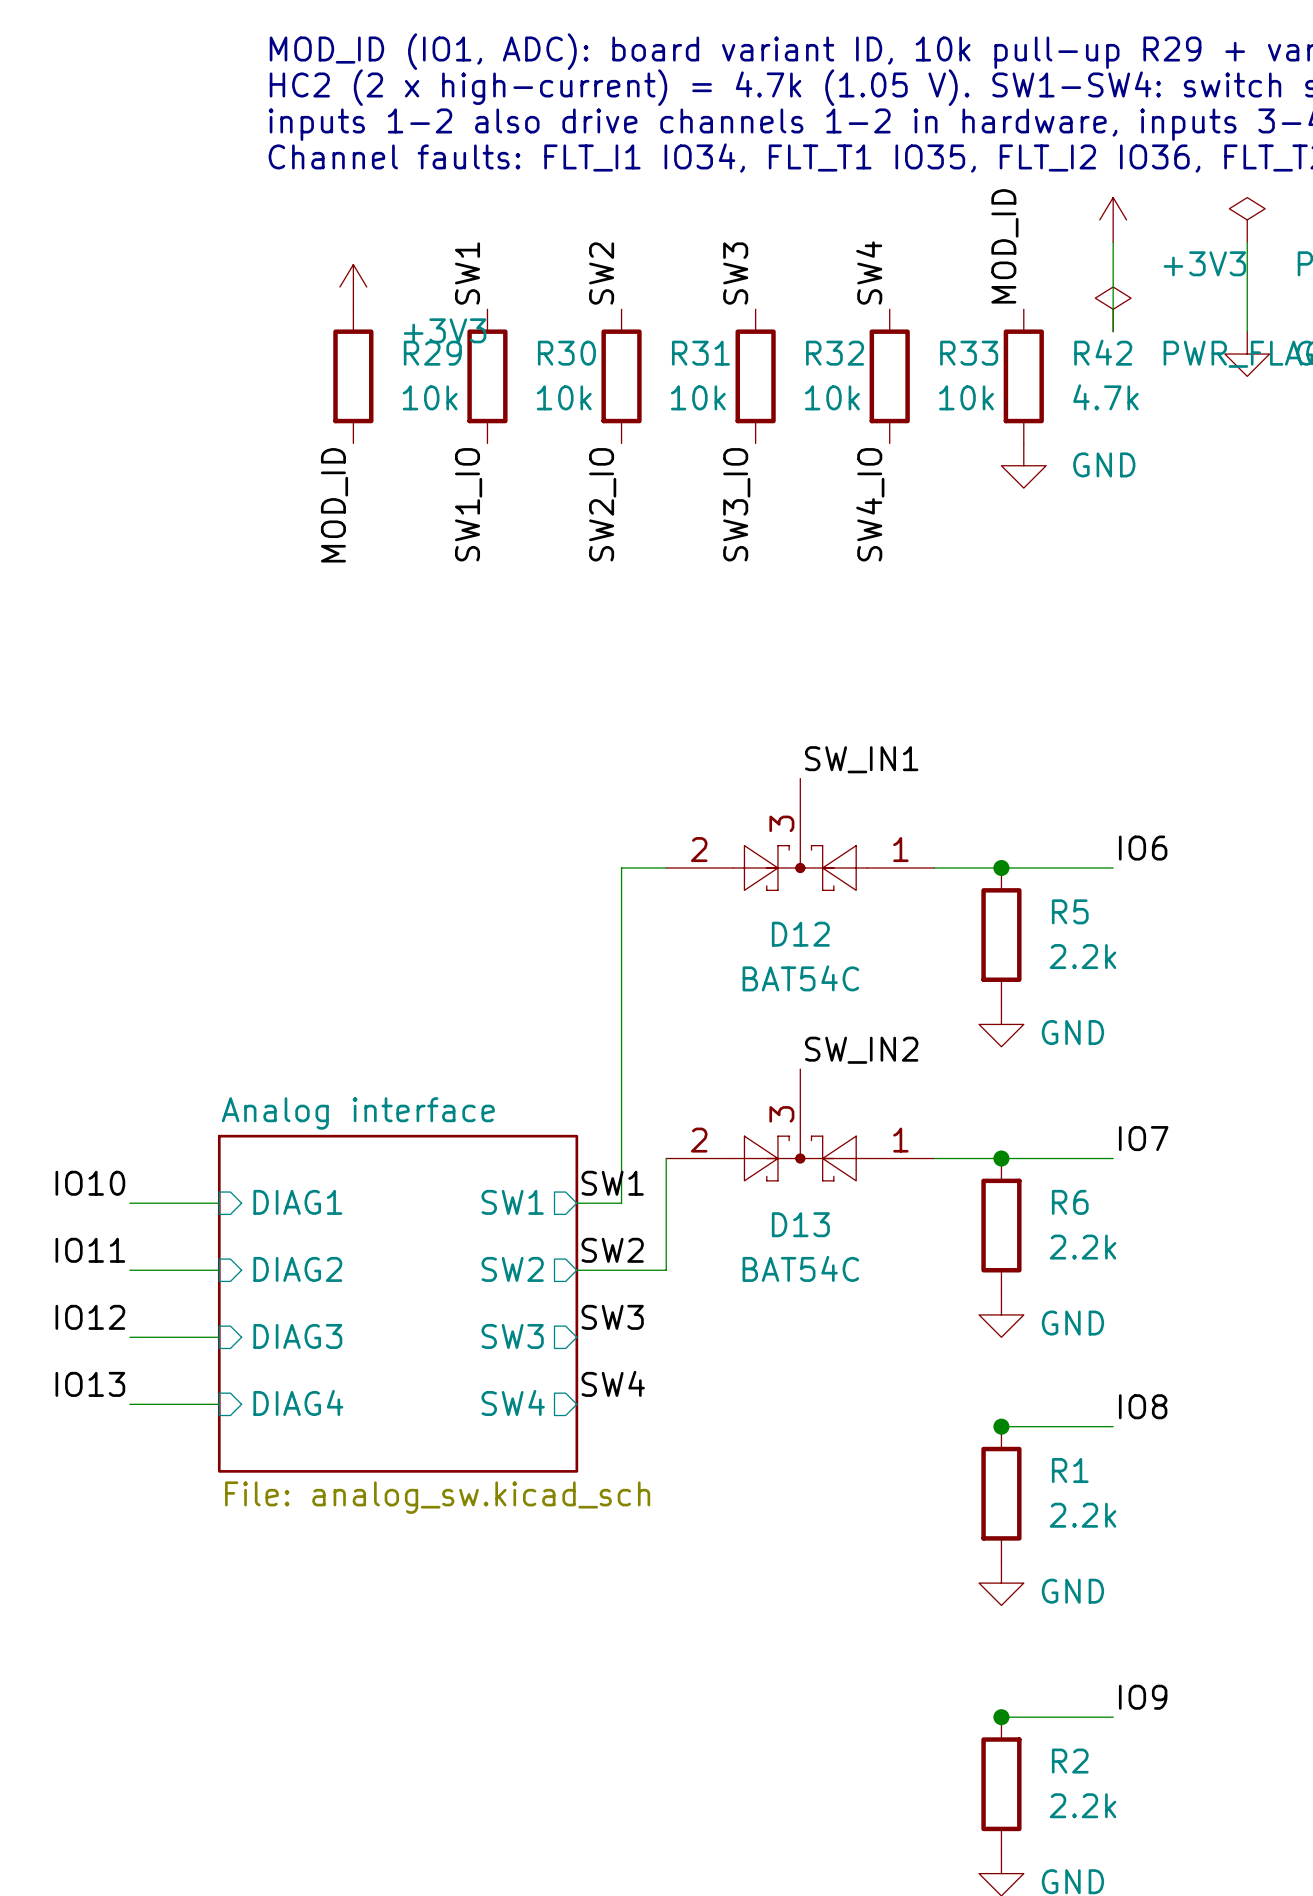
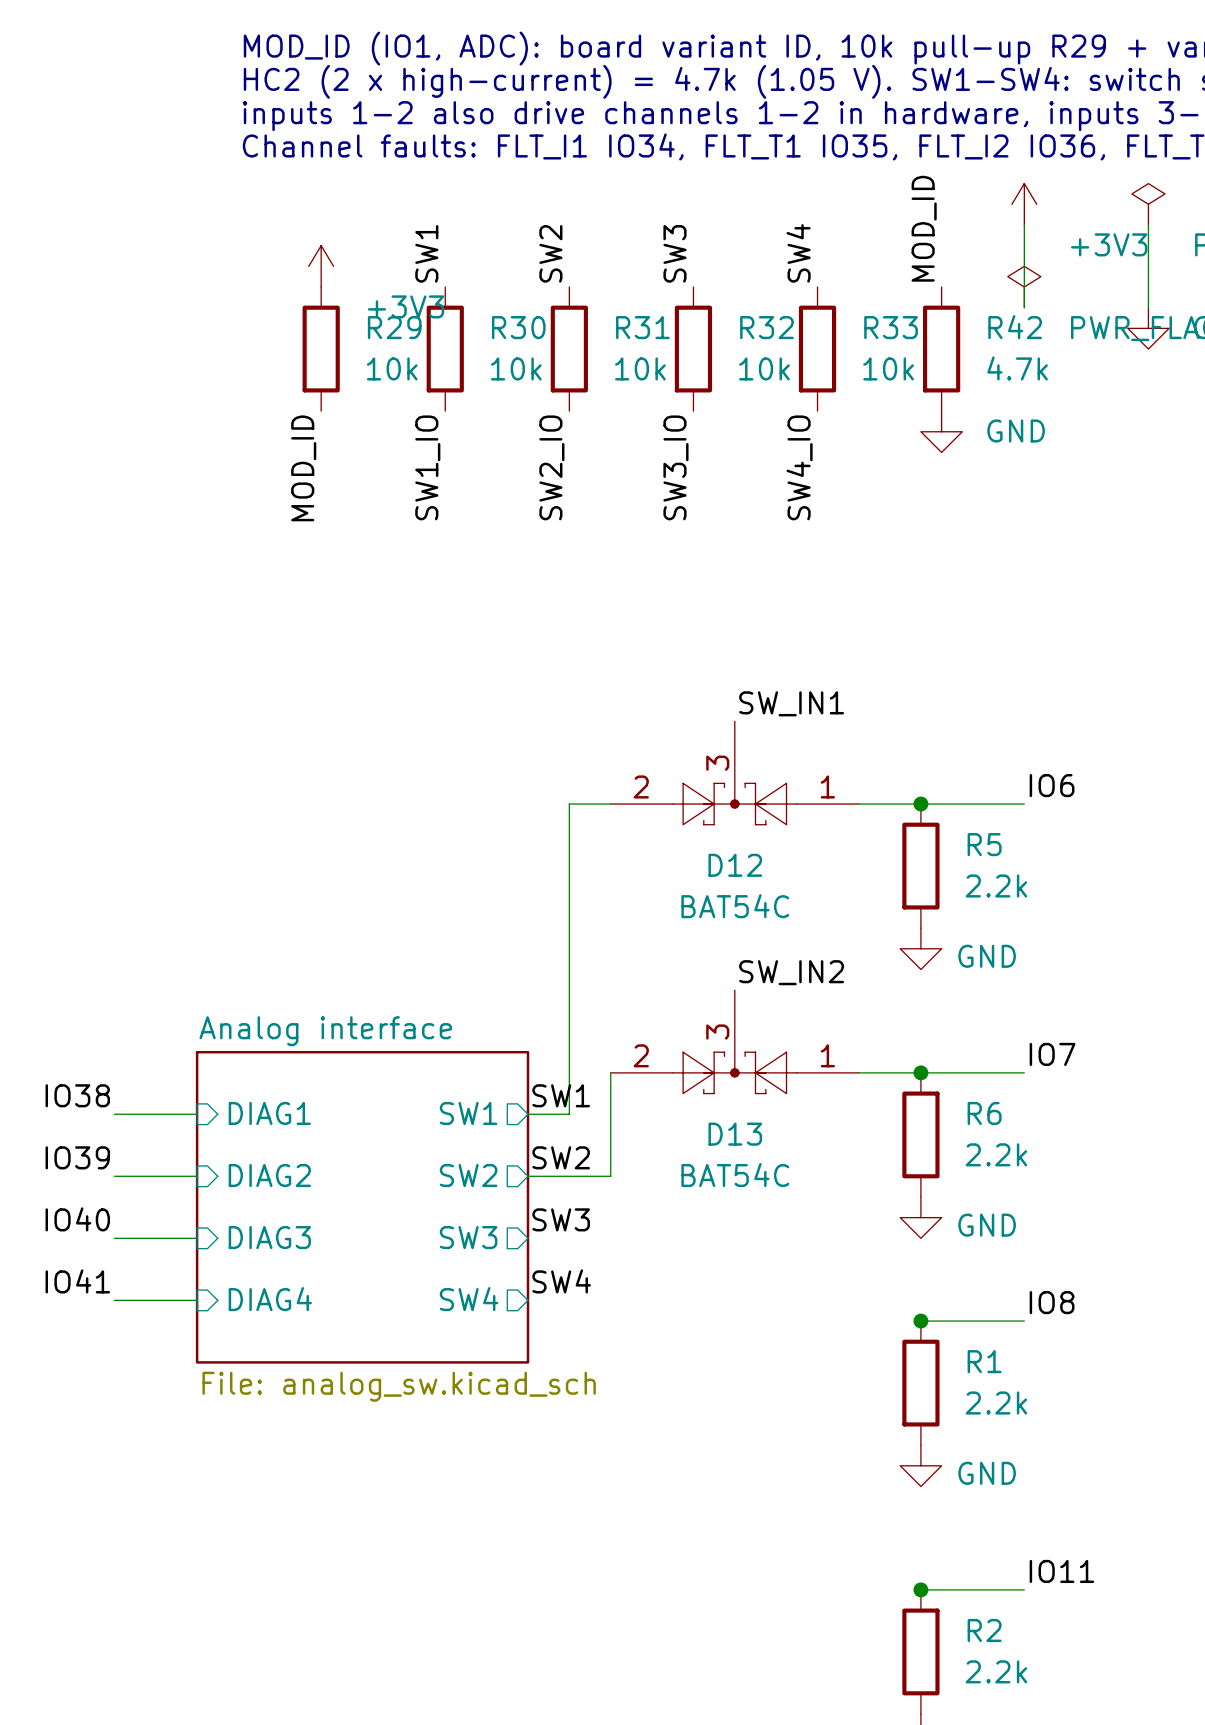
label: IO10 (90, 1183) -> IO38 (77, 1095)
label: IO11 (90, 1250) -> IO39 (77, 1157)
label: IO12 (90, 1317) -> IO40 (77, 1219)
label: IO13 (90, 1384) -> IO41 (77, 1281)
label: IO9 (1143, 1697) -> IO11 (1061, 1571)

